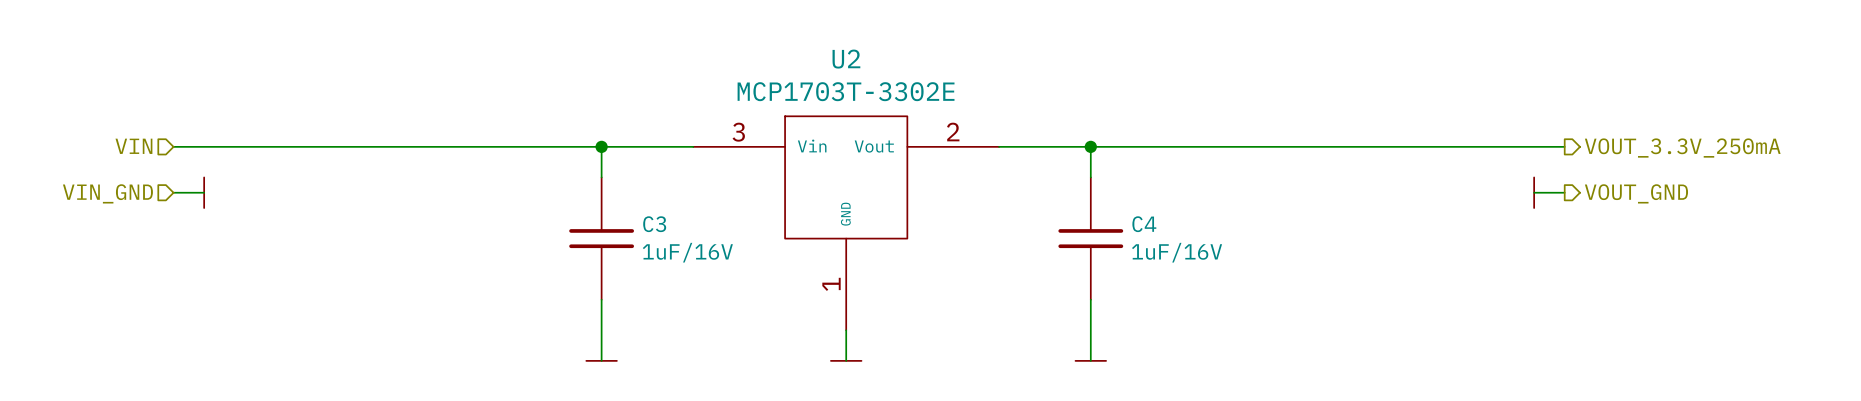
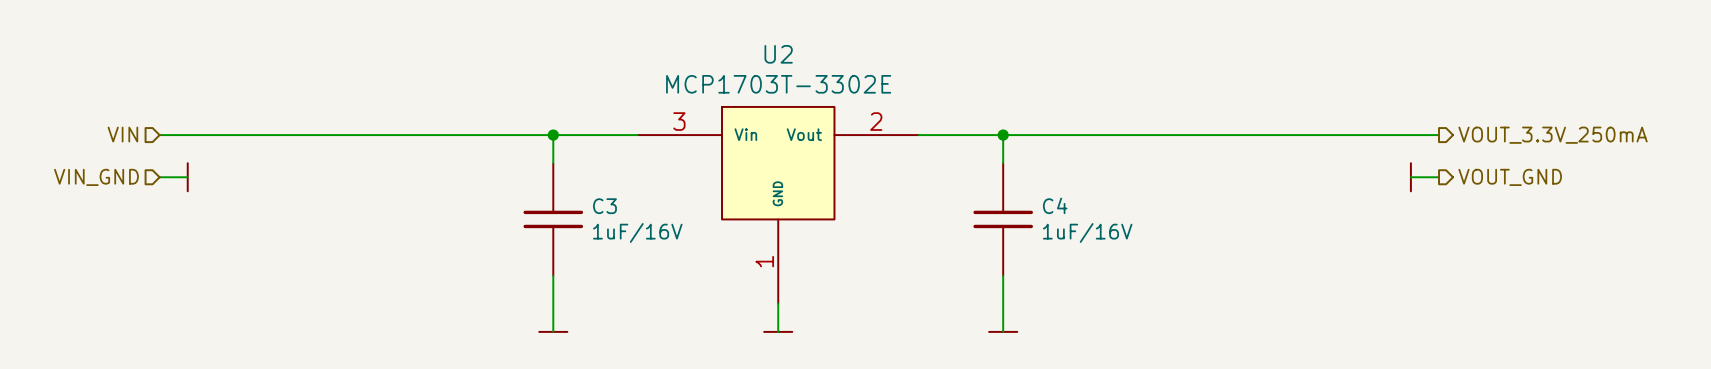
U2 symbol: [693, 116, 1000, 331] -> [637, 106, 919, 304]

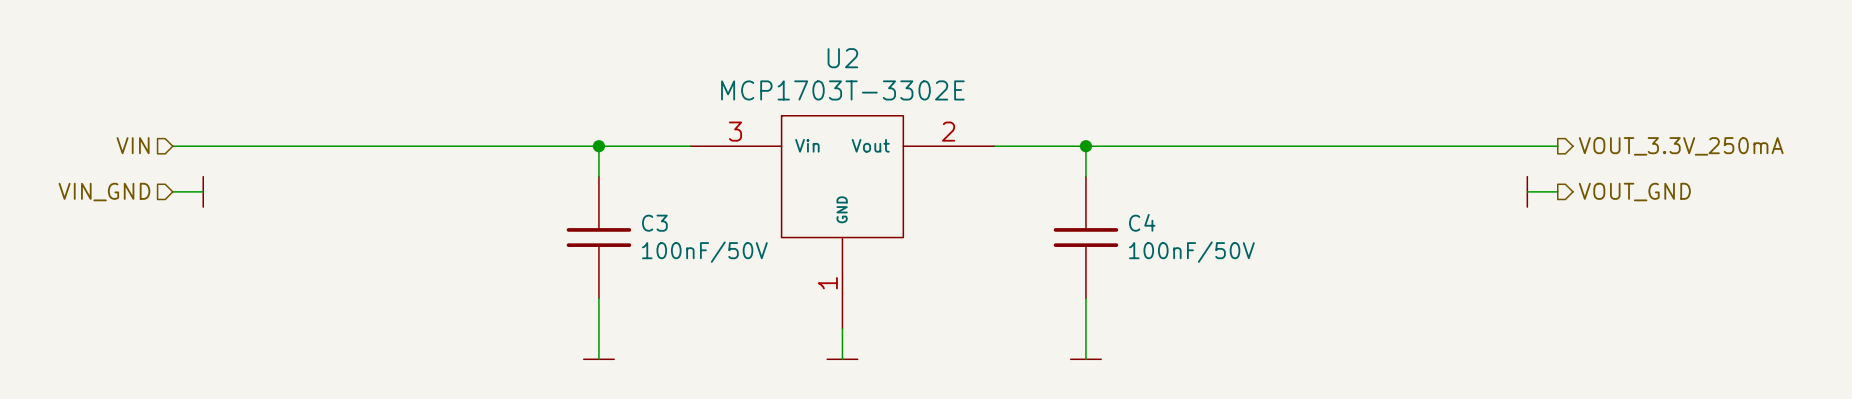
U2 symbol: [637, 106, 919, 304] -> [690, 115, 995, 329]
C3 value: 1uF/16V (637, 232) -> 100nF/50V (704, 252)
C4 value: 1uF/16V (1087, 232) -> 100nF/50V (1191, 252)

